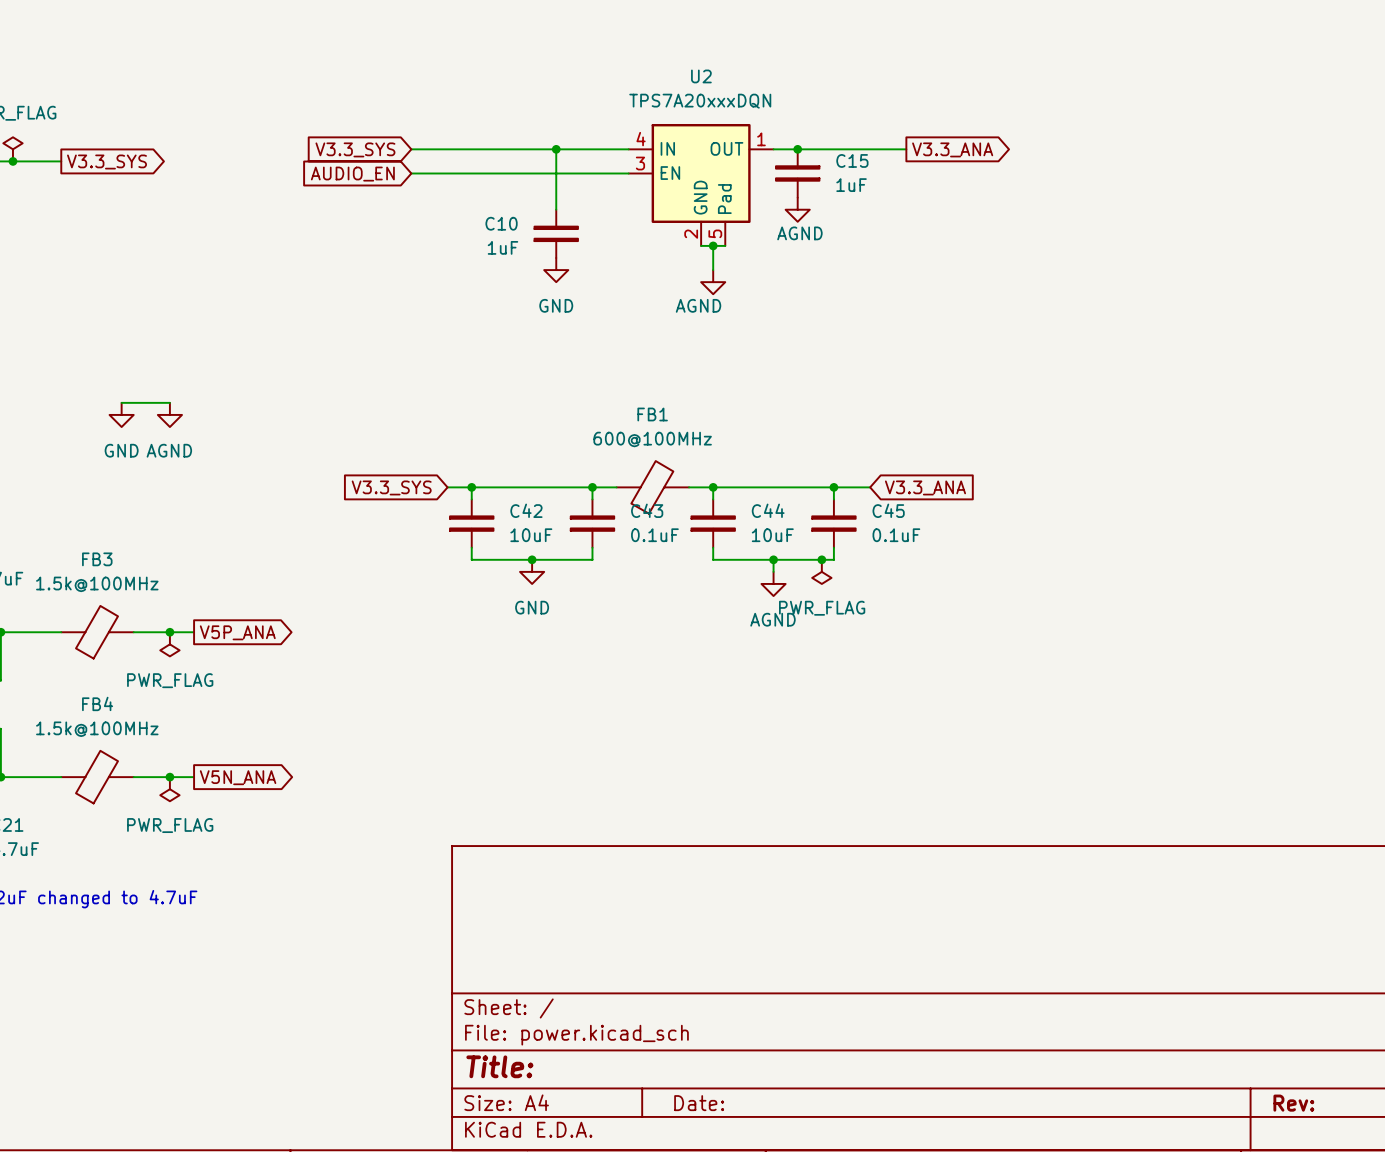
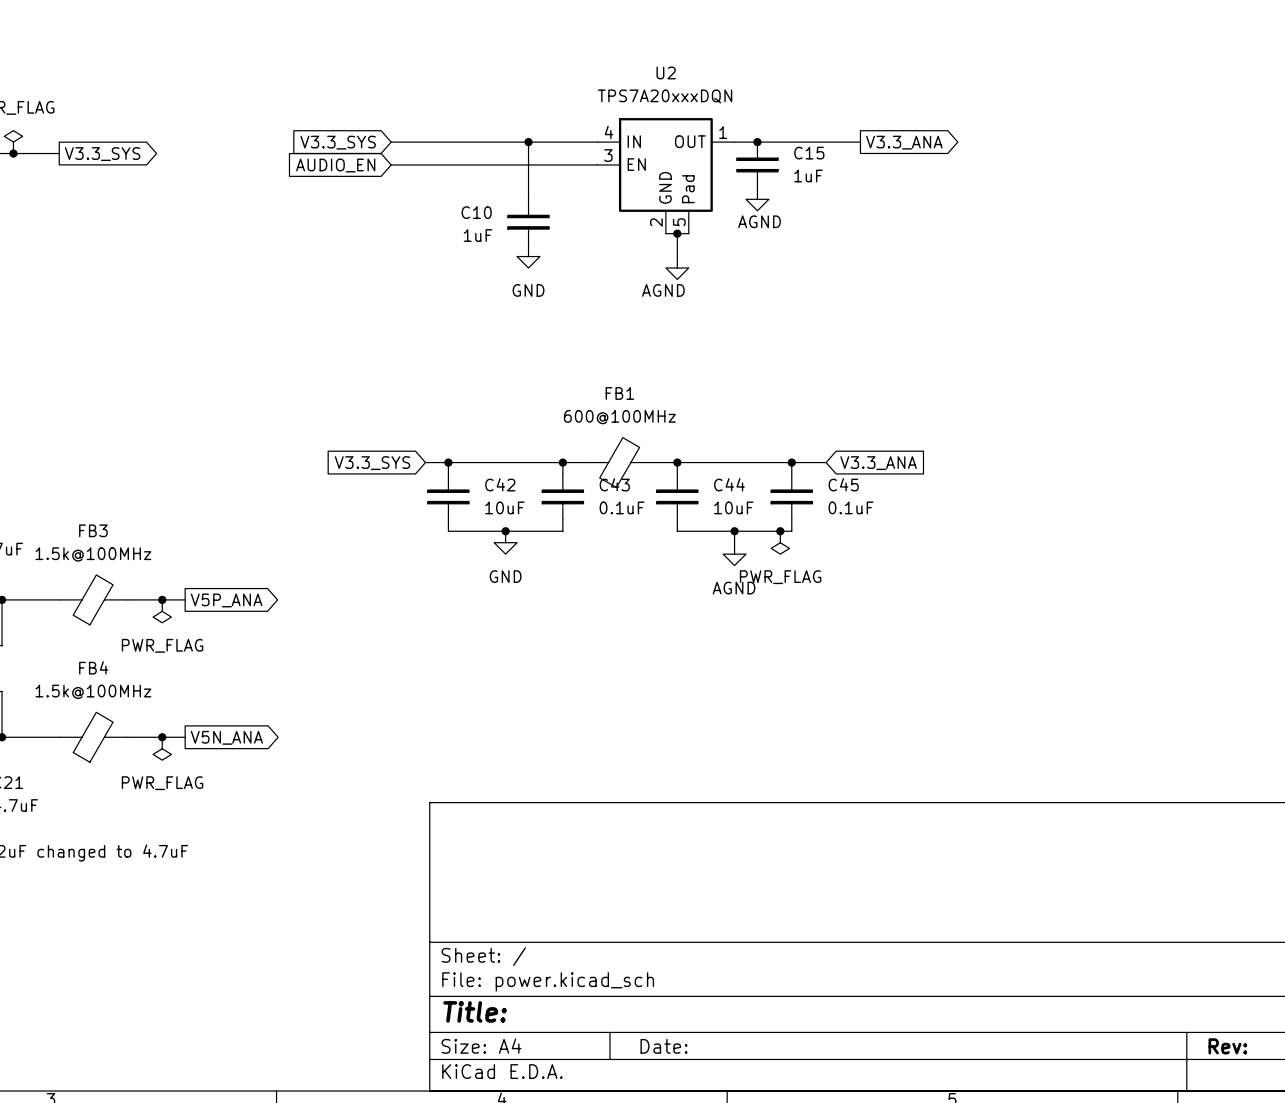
wire: (121, 402) (169, 402) -> none
power symbol: GND (121, 414) -> none
power symbol: AGND (169, 414) -> none

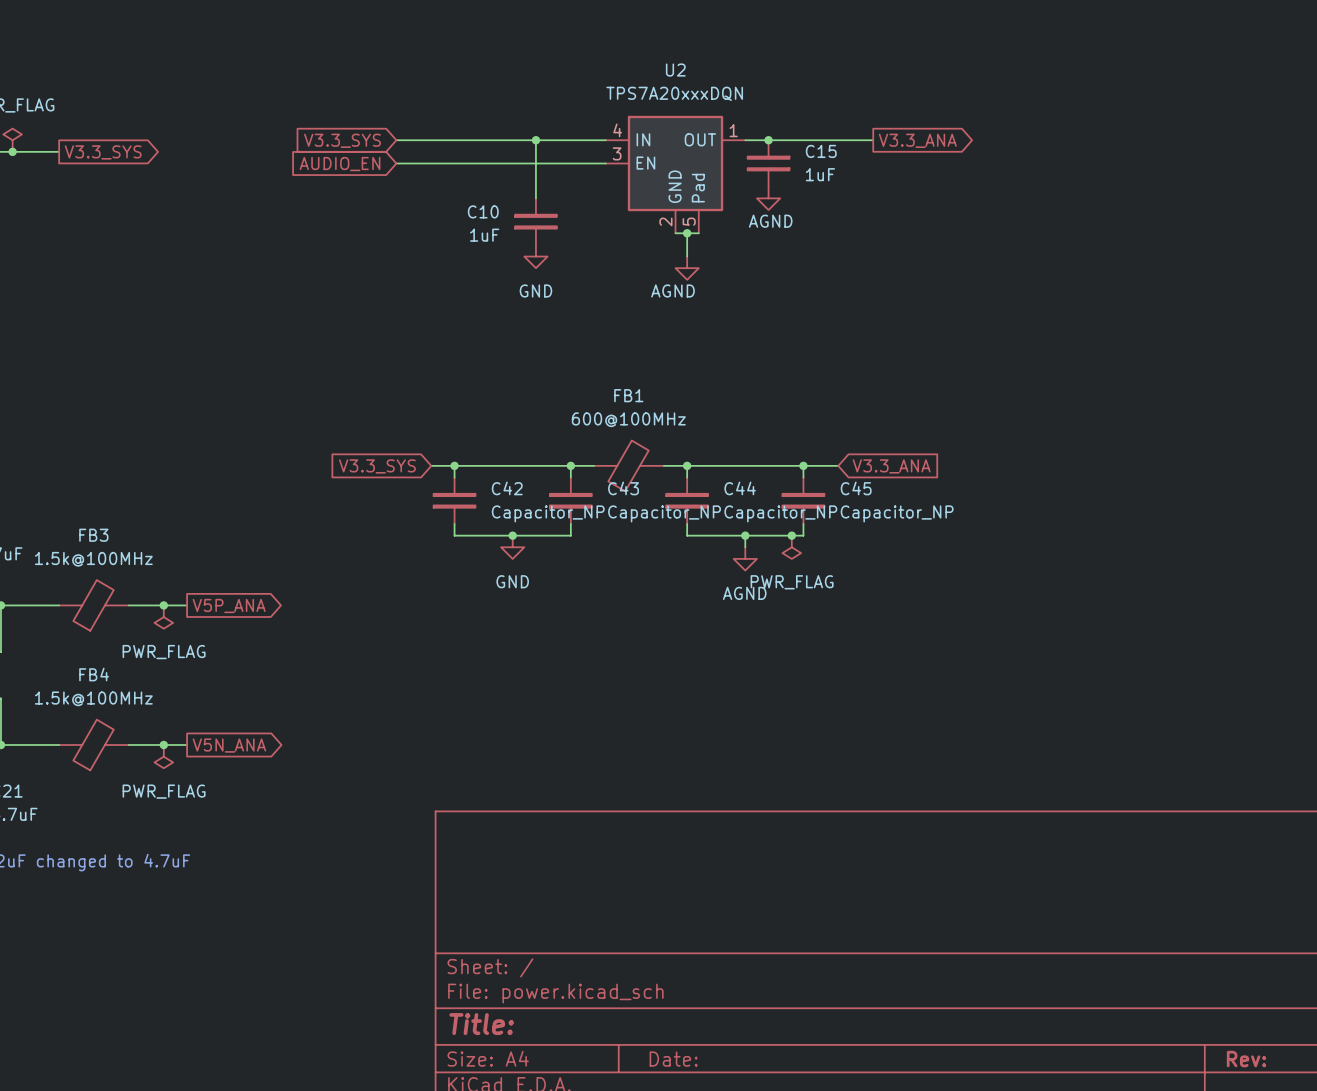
C42 value: 10uF (504, 507) -> Capacitor_NP (548, 513)
C43 value: 0.1uF (622, 507) -> Capacitor_NP (664, 513)
C44 value: 10uF (733, 507) -> Capacitor_NP (780, 513)
C45 value: 0.1uF (851, 507) -> Capacitor_NP (897, 513)

